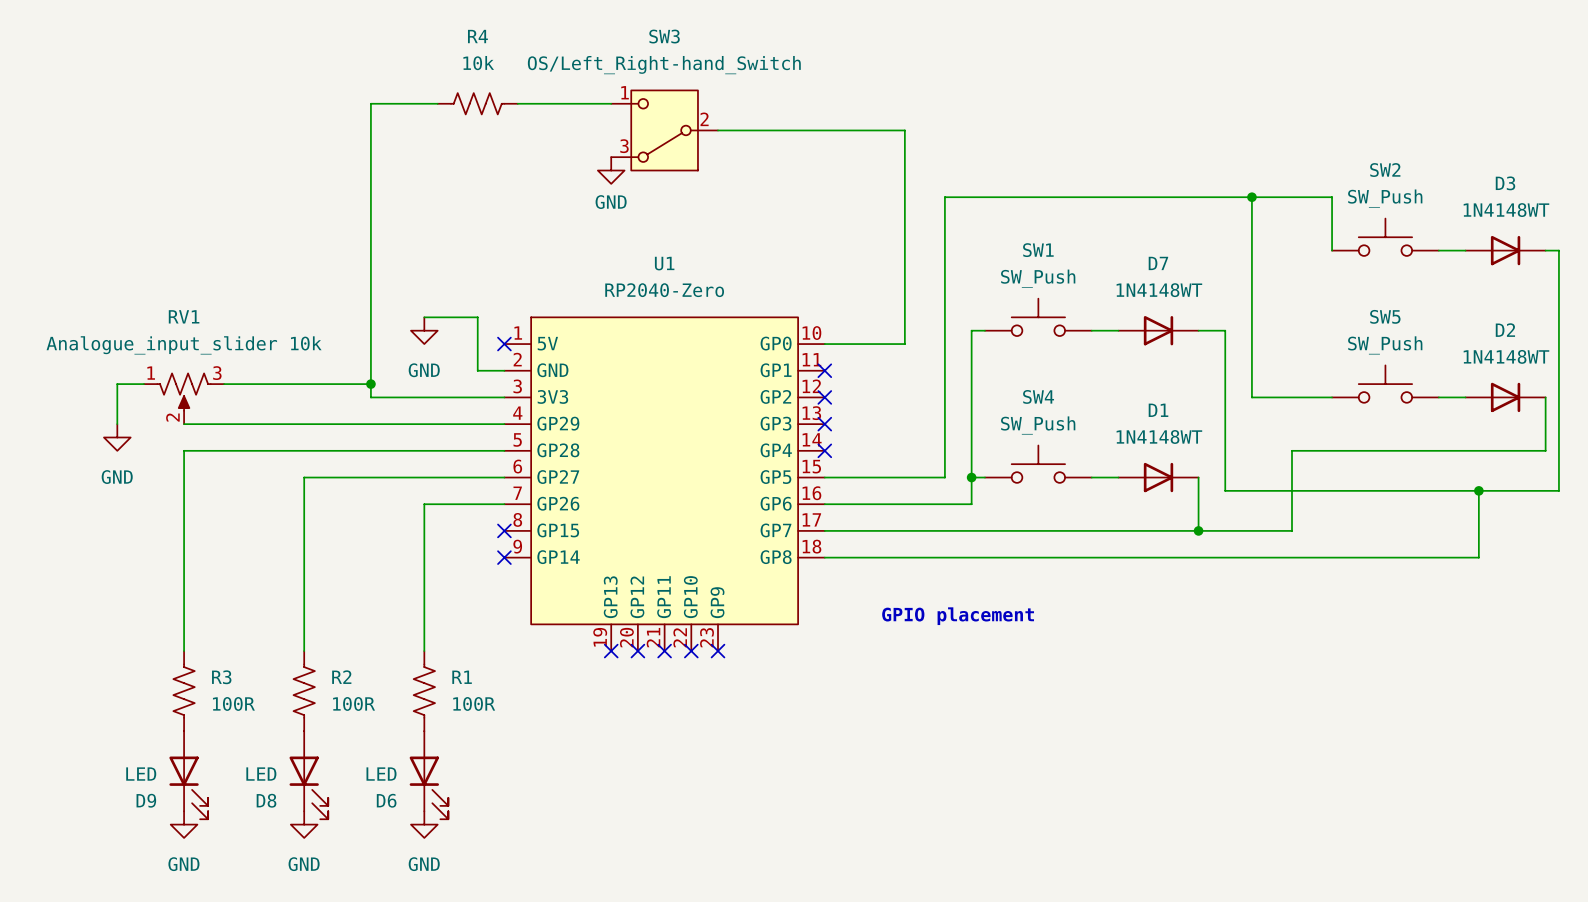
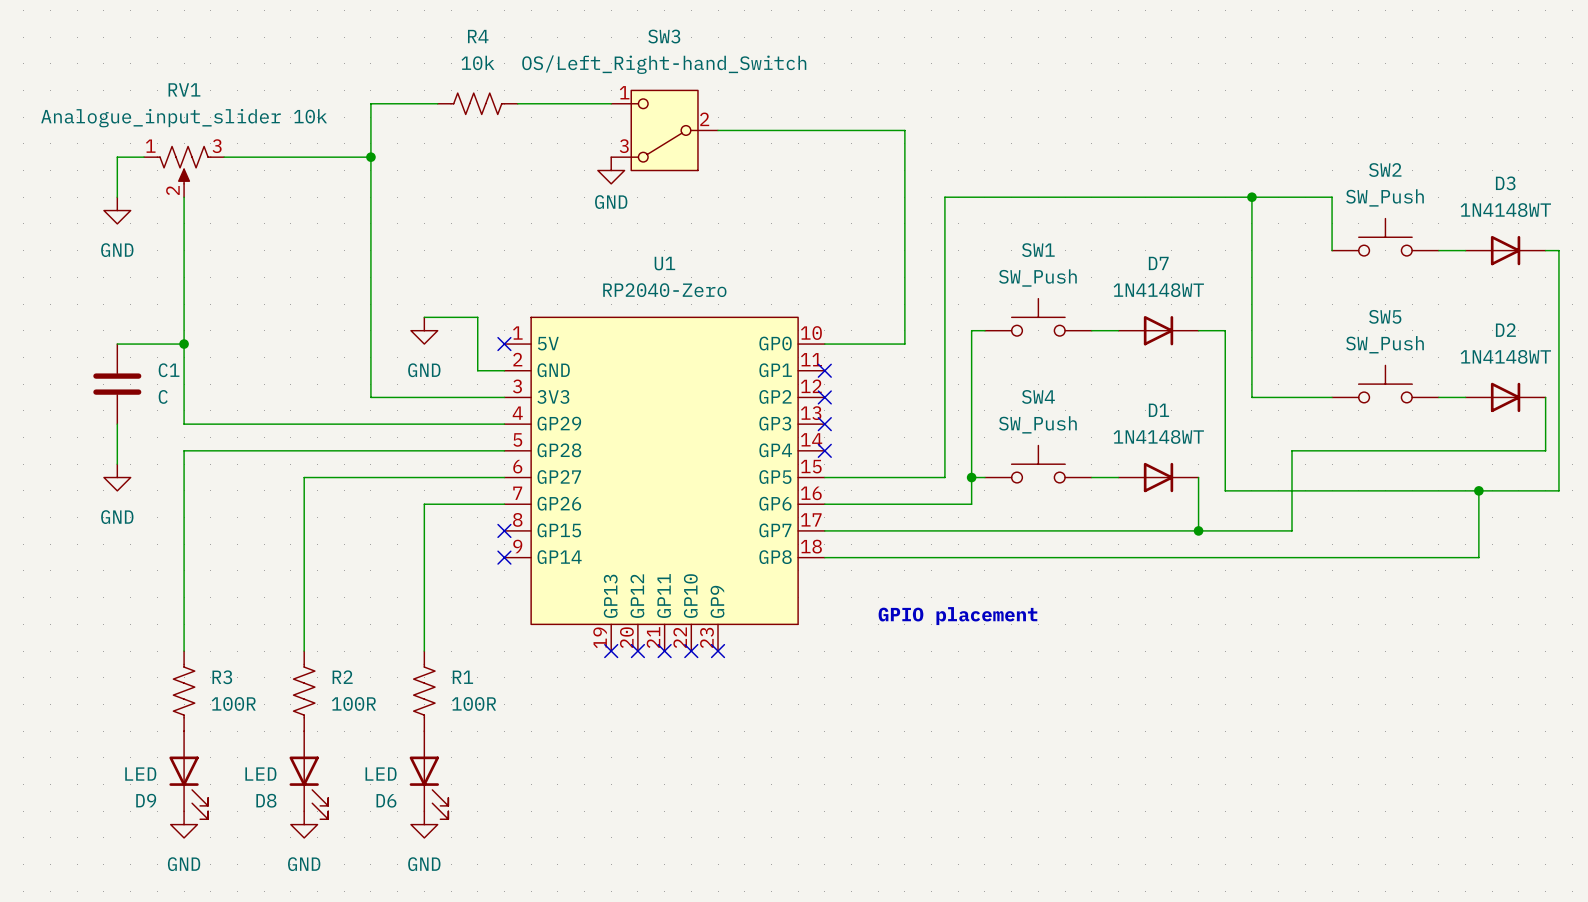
wire: none -> (144, 157) (117, 157) (117, 197)
junction: none -> (370, 157)
wire: none -> (184, 197) (184, 424)
power symbol: none -> GND (117, 210)
wire: none -> (117, 344) (184, 344)
junction: none -> (184, 344)
C1: none -> C (117, 384)
wire: (144, 384) (117, 384) (117, 424) -> (117, 464) (117, 424)
wire: (224, 384) (370, 384) -> (224, 157) (370, 157)
junction: (370, 384) -> none
RV1 position: (184, 398) -> (184, 171)
power symbol position: GND (117, 437) -> GND (117, 477)

